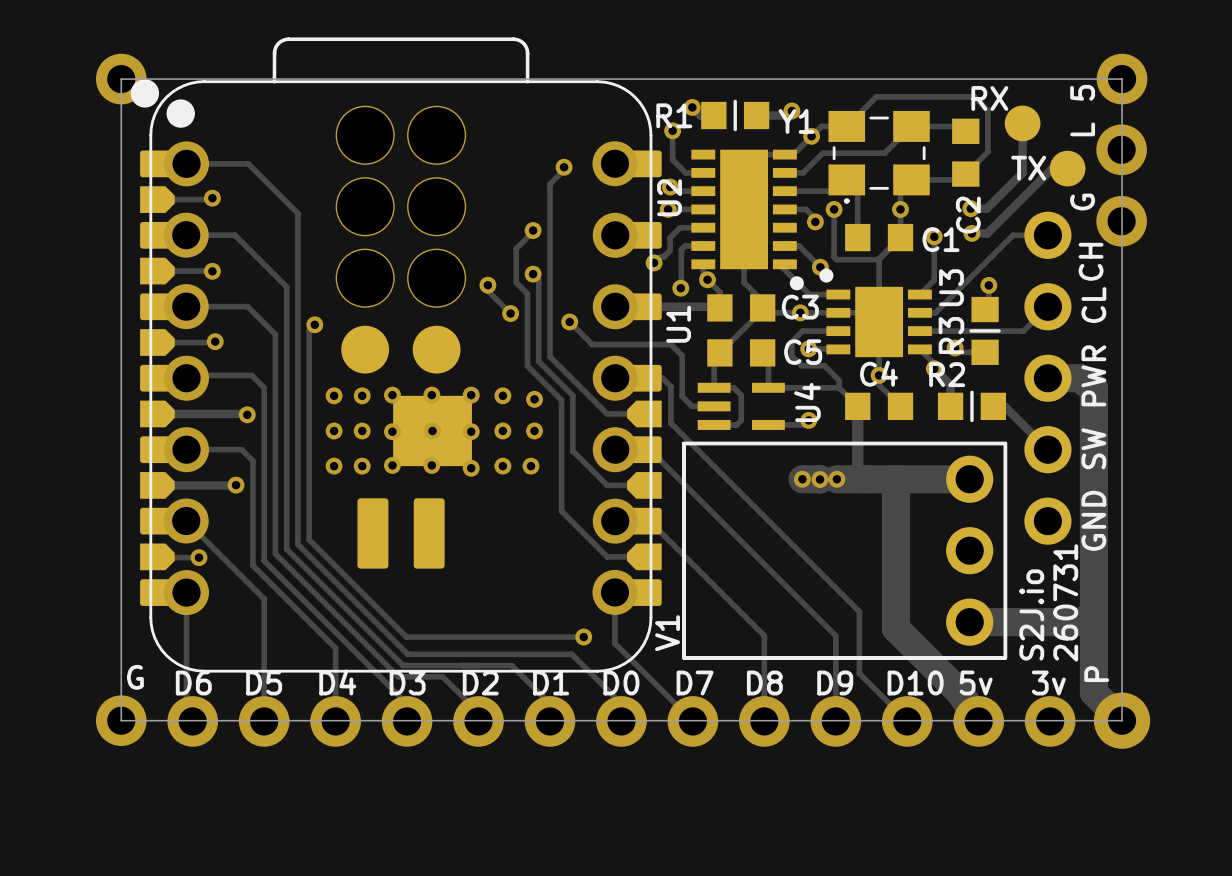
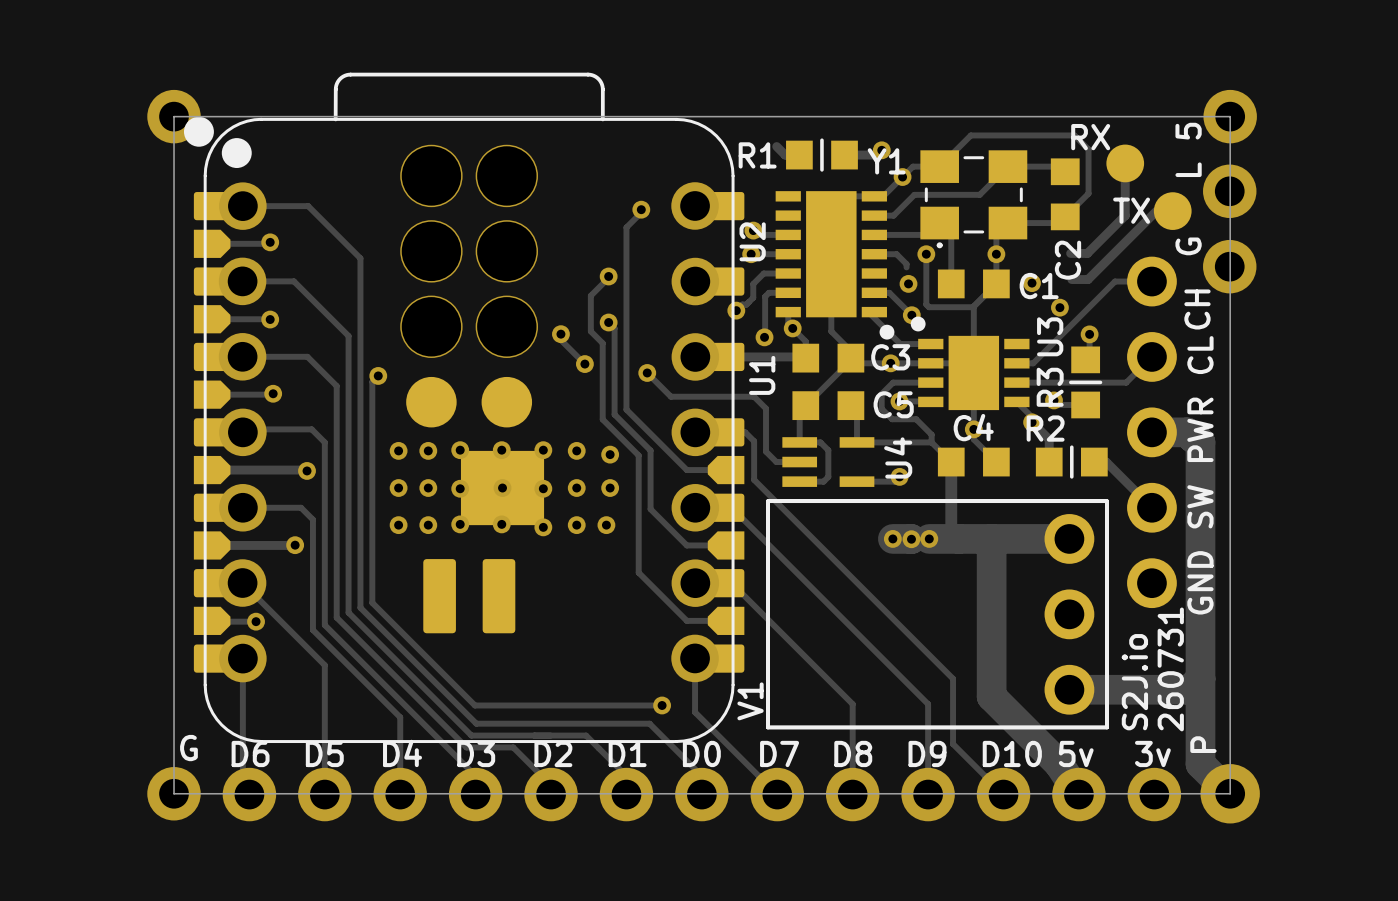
via: (692, 107) -> none
track: (672, 130) (672, 159) (685, 172) (703, 172) -> none
via: (672, 130) -> none
via: (970, 208) -> none
via position: (815, 221) -> (908, 283)
via: (971, 233) -> none
track: (934, 236) (934, 280) (919, 294) -> none
via: none -> (1059, 307)

